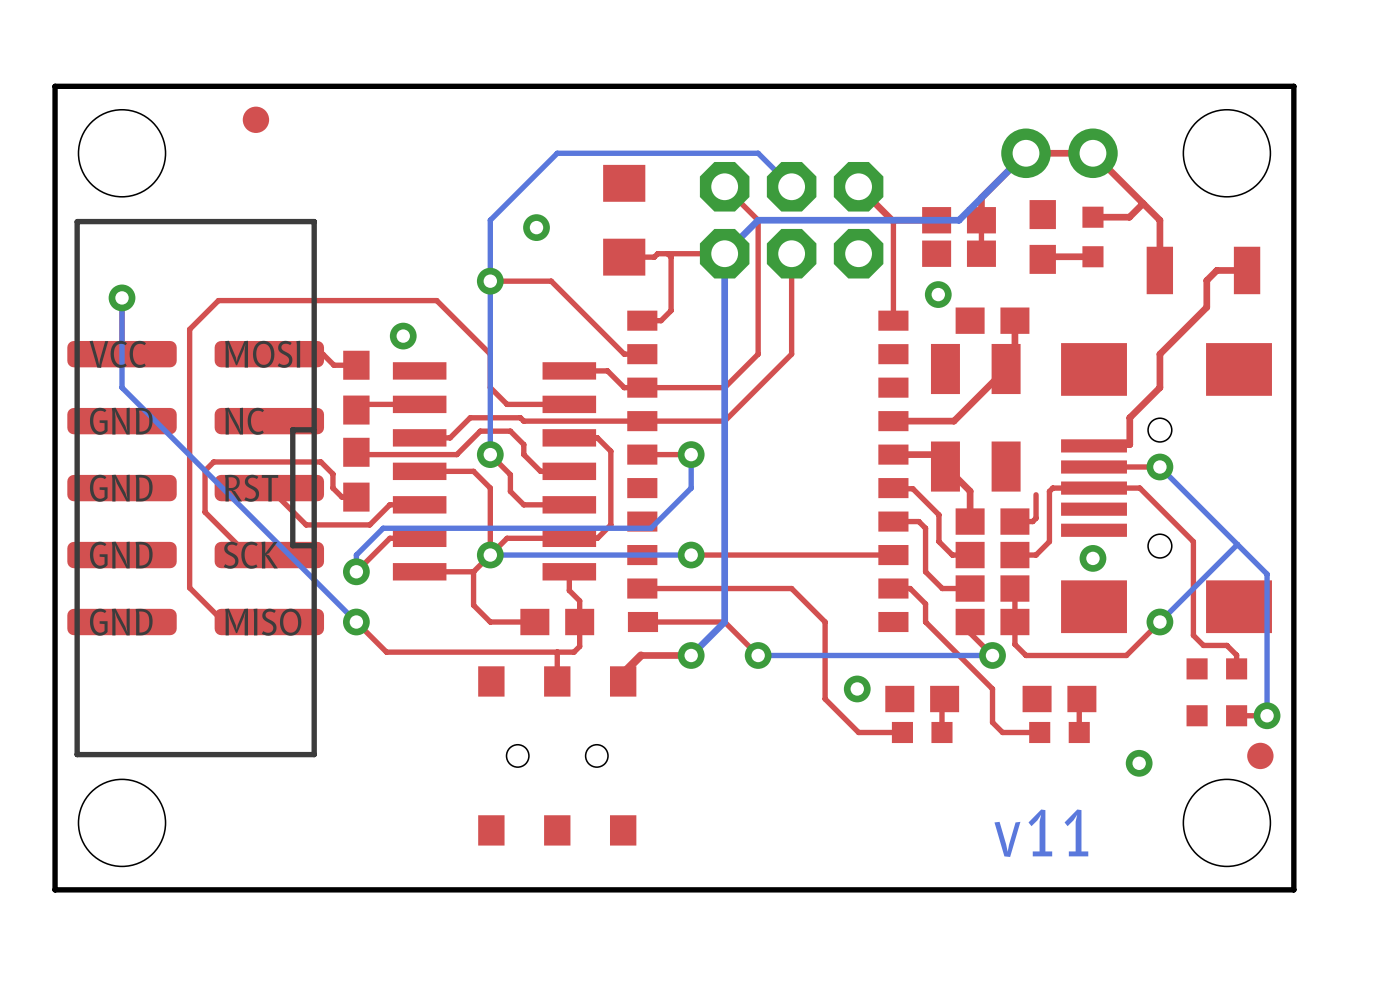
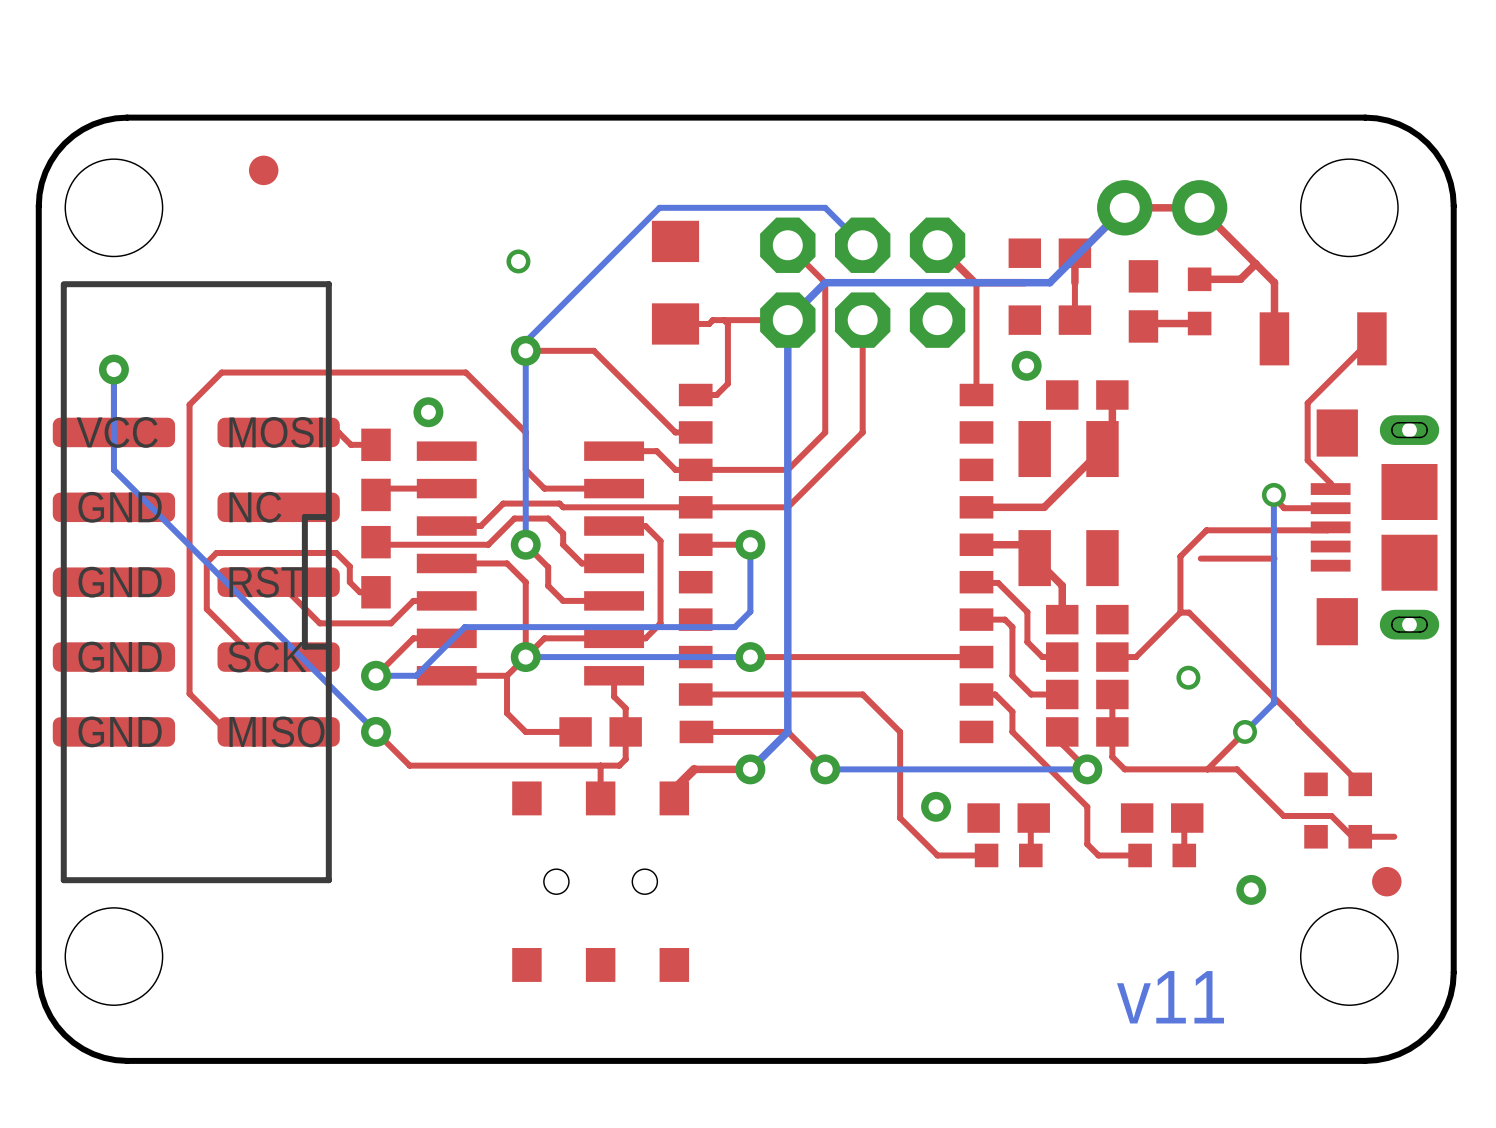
board edge: (1293, 86) (55, 86) (55, 889) (1293, 889) (1293, 86) -> (1365, 117) (1388, 120) (1399, 124) (1419, 135) (1427, 143) (1435, 152) (1446, 172) (1450, 183) (1453, 206) (1453, 972) (1450, 995) (1441, 1016) (1435, 1026) (1419, 1042) (1409, 1049) (1388, 1057) (1365, 1060) (127, 1060) (104, 1057) (82, 1049) (73, 1042) (57, 1026) (50, 1016) (41, 995) (38, 972) (38, 206) (41, 183) (50, 161) (57, 152) (73, 135) (82, 129) (104, 120) (127, 117) (1365, 117)
bottom track: (609, 153) (557, 153) (490, 220) (490, 272) -> (659, 207) (525, 341)
via: none -> (518, 261)
part position: (959, 220) -> (1049, 253)
via: (536, 227) -> none
top track: (1247, 270) (1216, 270) (1206, 280) (1206, 307) (1159, 354) (1159, 387) (1129, 417) (1129, 444) (1094, 445) (1101, 445) -> (1371, 338) (1307, 403) (1307, 460) (1330, 483) (1330, 489)
bottom track: none -> (1273, 494) (1273, 703) (1245, 731)
top track: none -> (1273, 494) (1273, 497) (1284, 508) (1330, 508)
via: none -> (1273, 494)
top track: none -> (1330, 527) (1327, 530) (1206, 530) (1180, 556) (1180, 612)
part: none -> (1374, 527)
via: (1159, 466) -> none
bottom track: (1159, 468) (1267, 574) (1267, 715) -> none
bottom track: (691, 488) (651, 528) -> (750, 582) (750, 611) (734, 627) (705, 627)
part: (1166, 488) -> none
top track: (1036, 494) (1036, 518) (1032, 521) (1014, 521) -> none
top track: none -> (1180, 612) (1150, 642)
top track: none -> (1180, 612) (1189, 612) (1298, 722)
bottom track: (435, 528) (383, 528) (356, 555) (356, 571) -> (464, 627) (416, 675) (376, 675)
top track: (1049, 541) (1049, 491) (1052, 488) (1139, 488) (1193, 541) (1193, 635) (1203, 645) (1226, 645) (1236, 655) (1236, 668) -> (1298, 722) (1360, 784)
bottom track: (1237, 544) (1159, 622) -> none
via position: (1092, 558) -> (1188, 677)
top track: none -> (1245, 731) (1207, 769)
via: none -> (1245, 731)
top track: (1159, 622) (1126, 655) -> (1360, 836) (1352, 836) (1331, 815) (1283, 815) (1237, 769)
via: (1159, 622) -> none
via: (1267, 715) -> none
text position: v11 (1041, 833) -> v11 (1170, 997)

